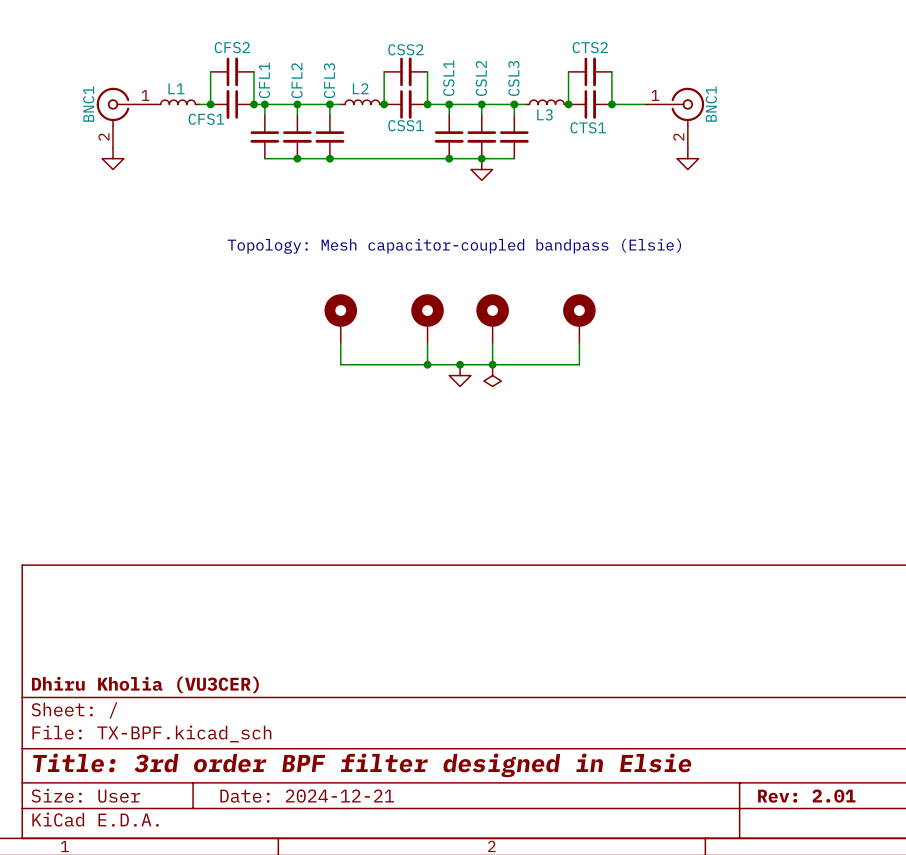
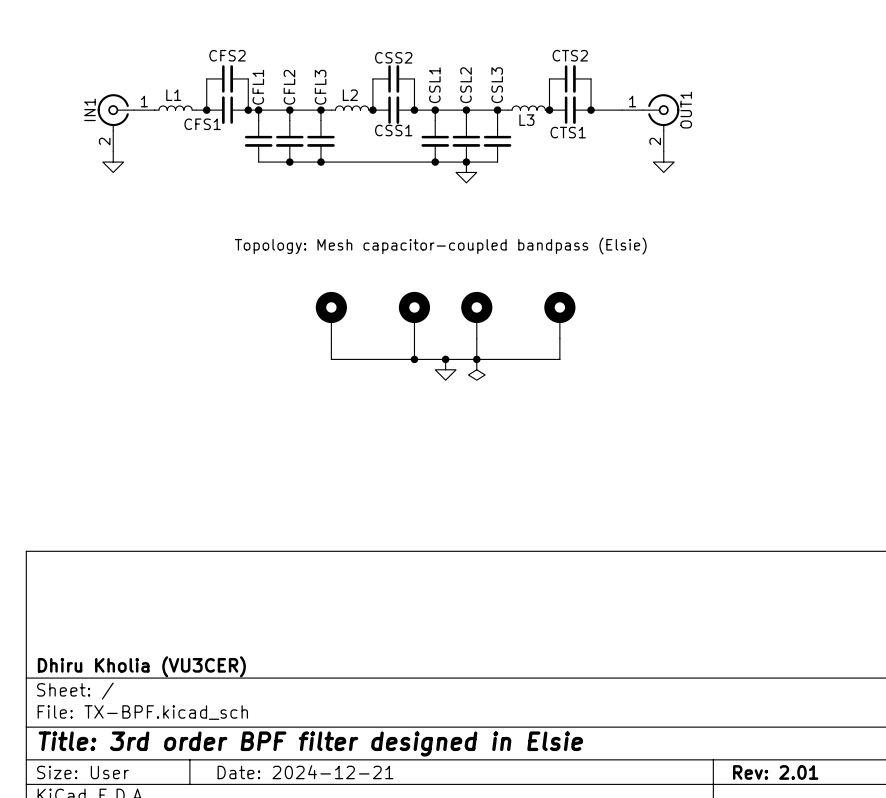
BNC1 name: BNC1 (88, 104) -> IN1 (90, 109)
BNC1 name: BNC1 (711, 104) -> OUT1 (686, 110)

